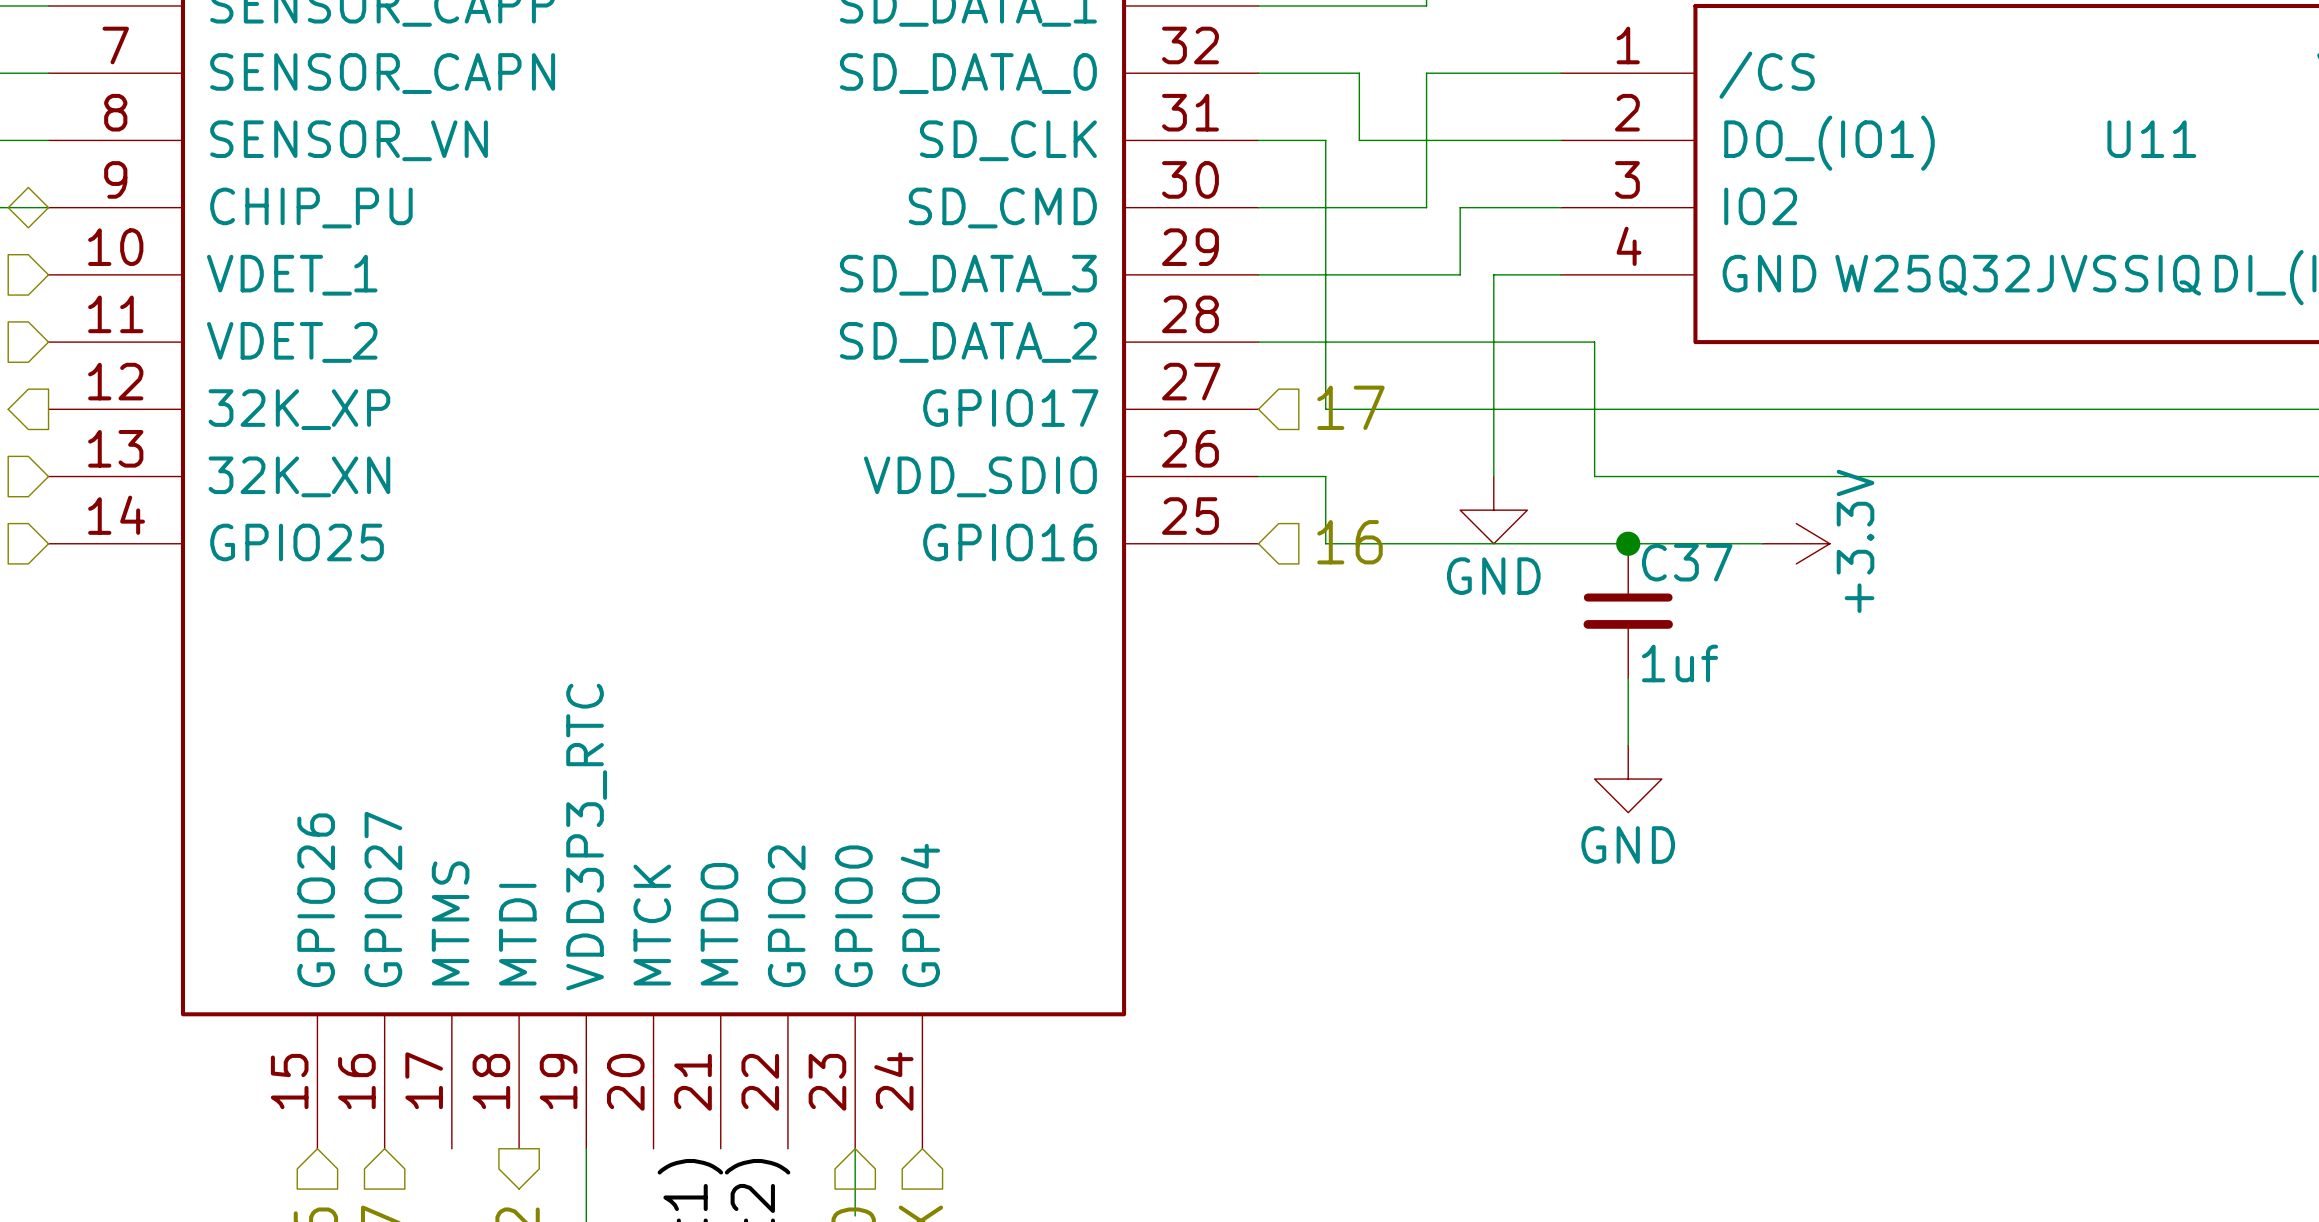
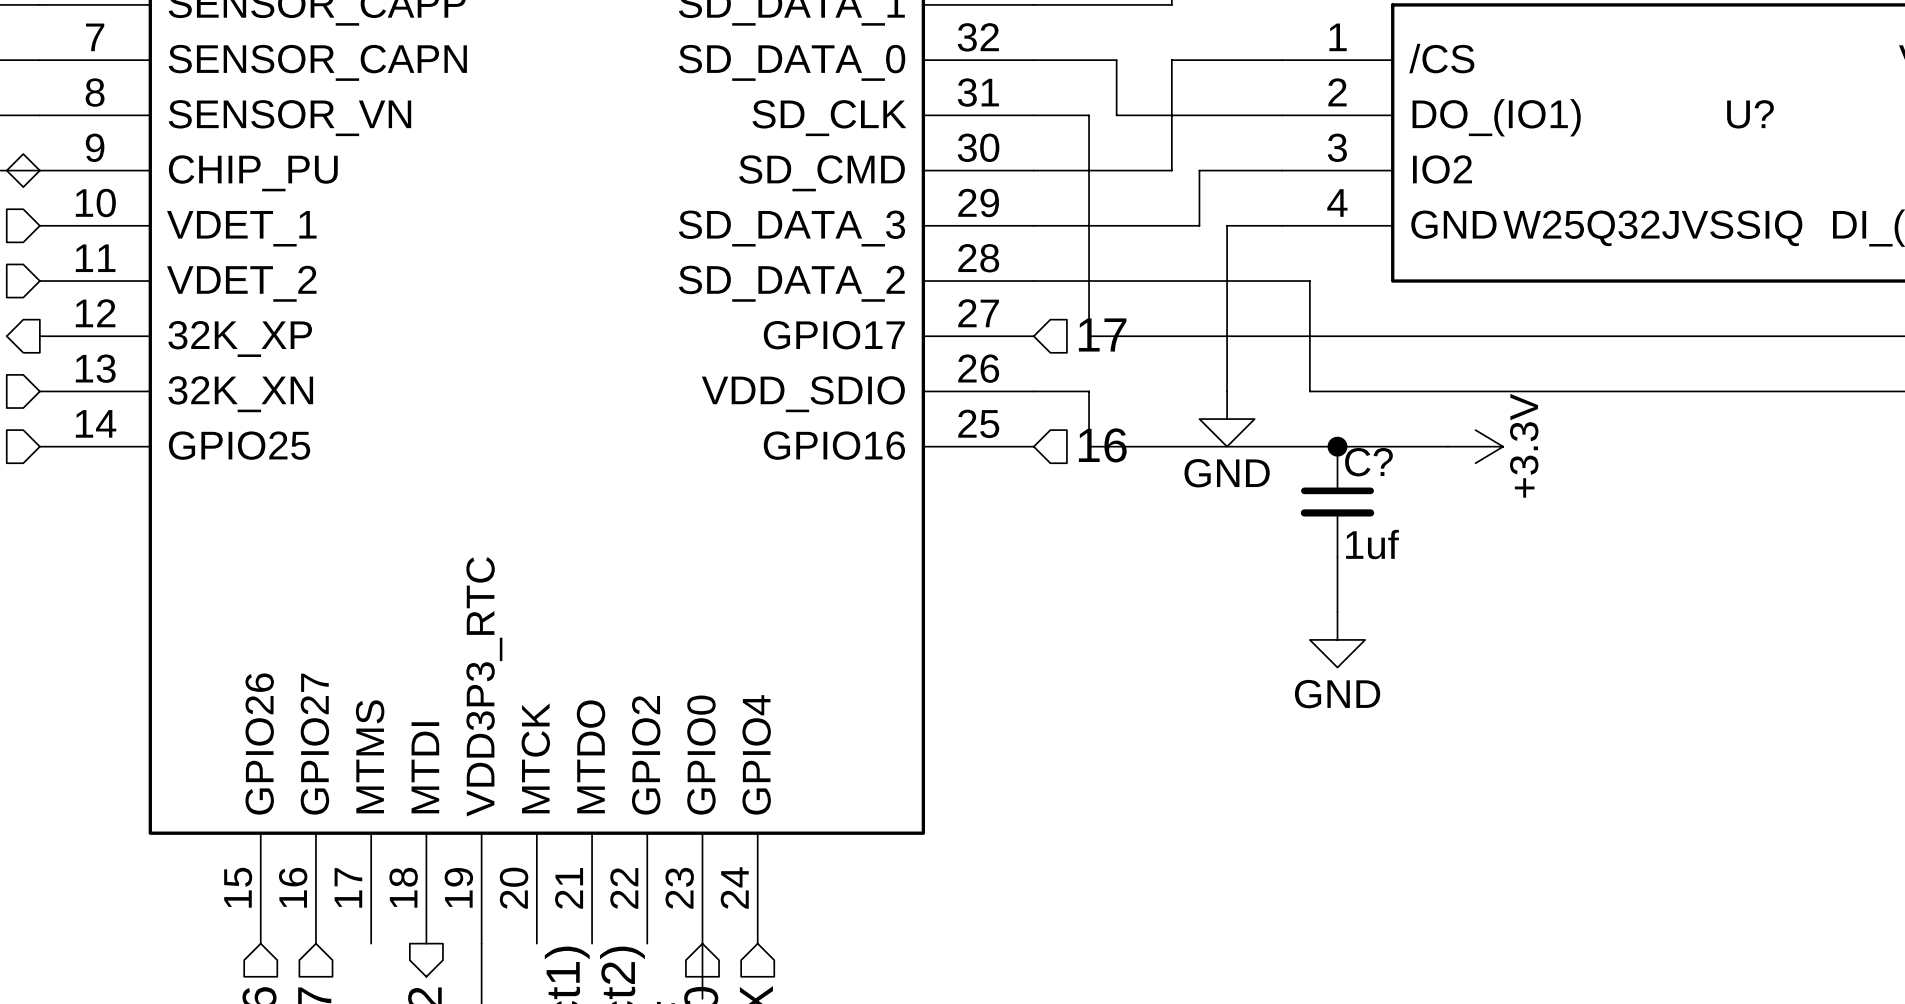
U11 name: U11 (2151, 139) -> U? (1750, 114)
C37 name: C37 (1687, 562) -> C? (1368, 462)

